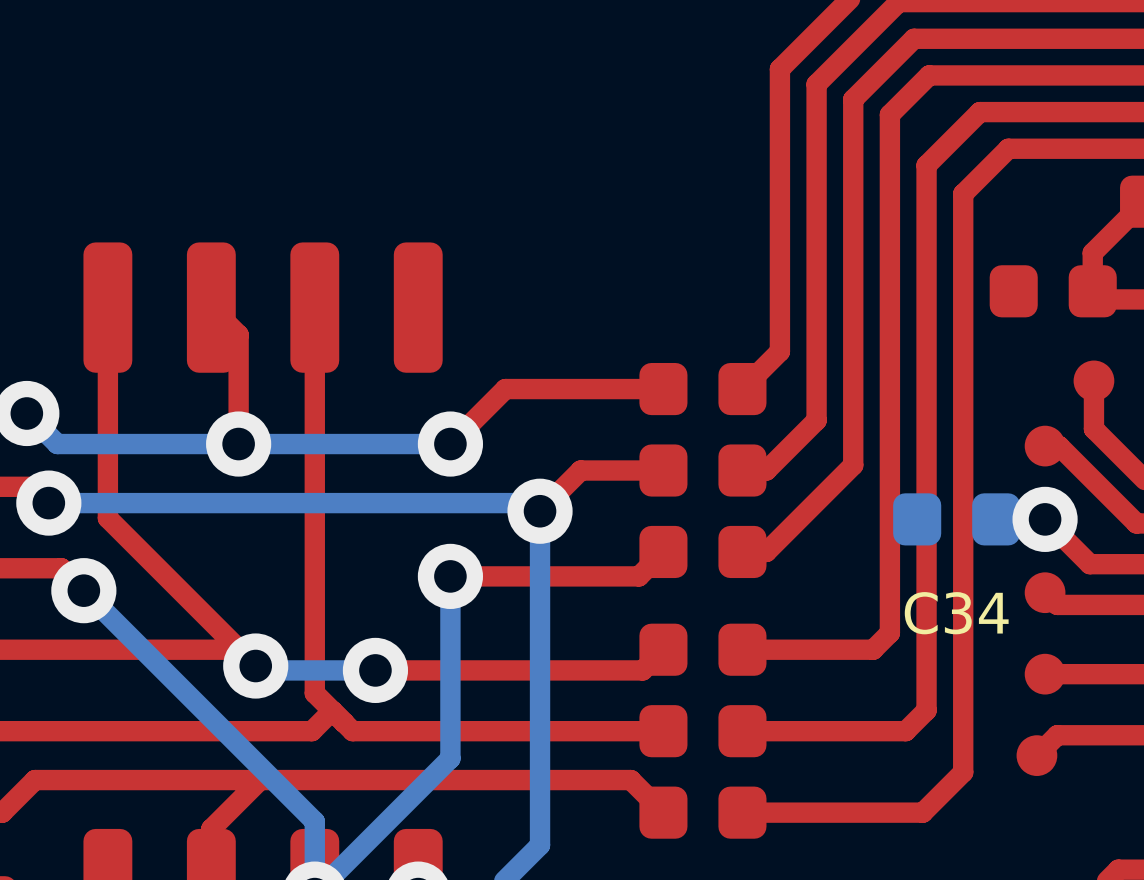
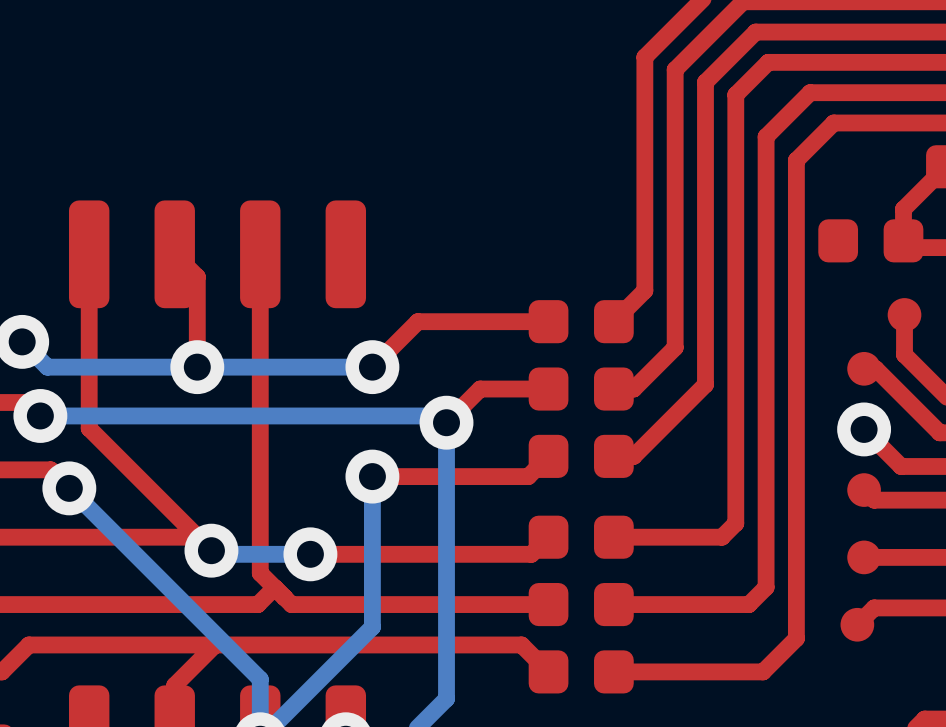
C34: (956, 519) -> none

